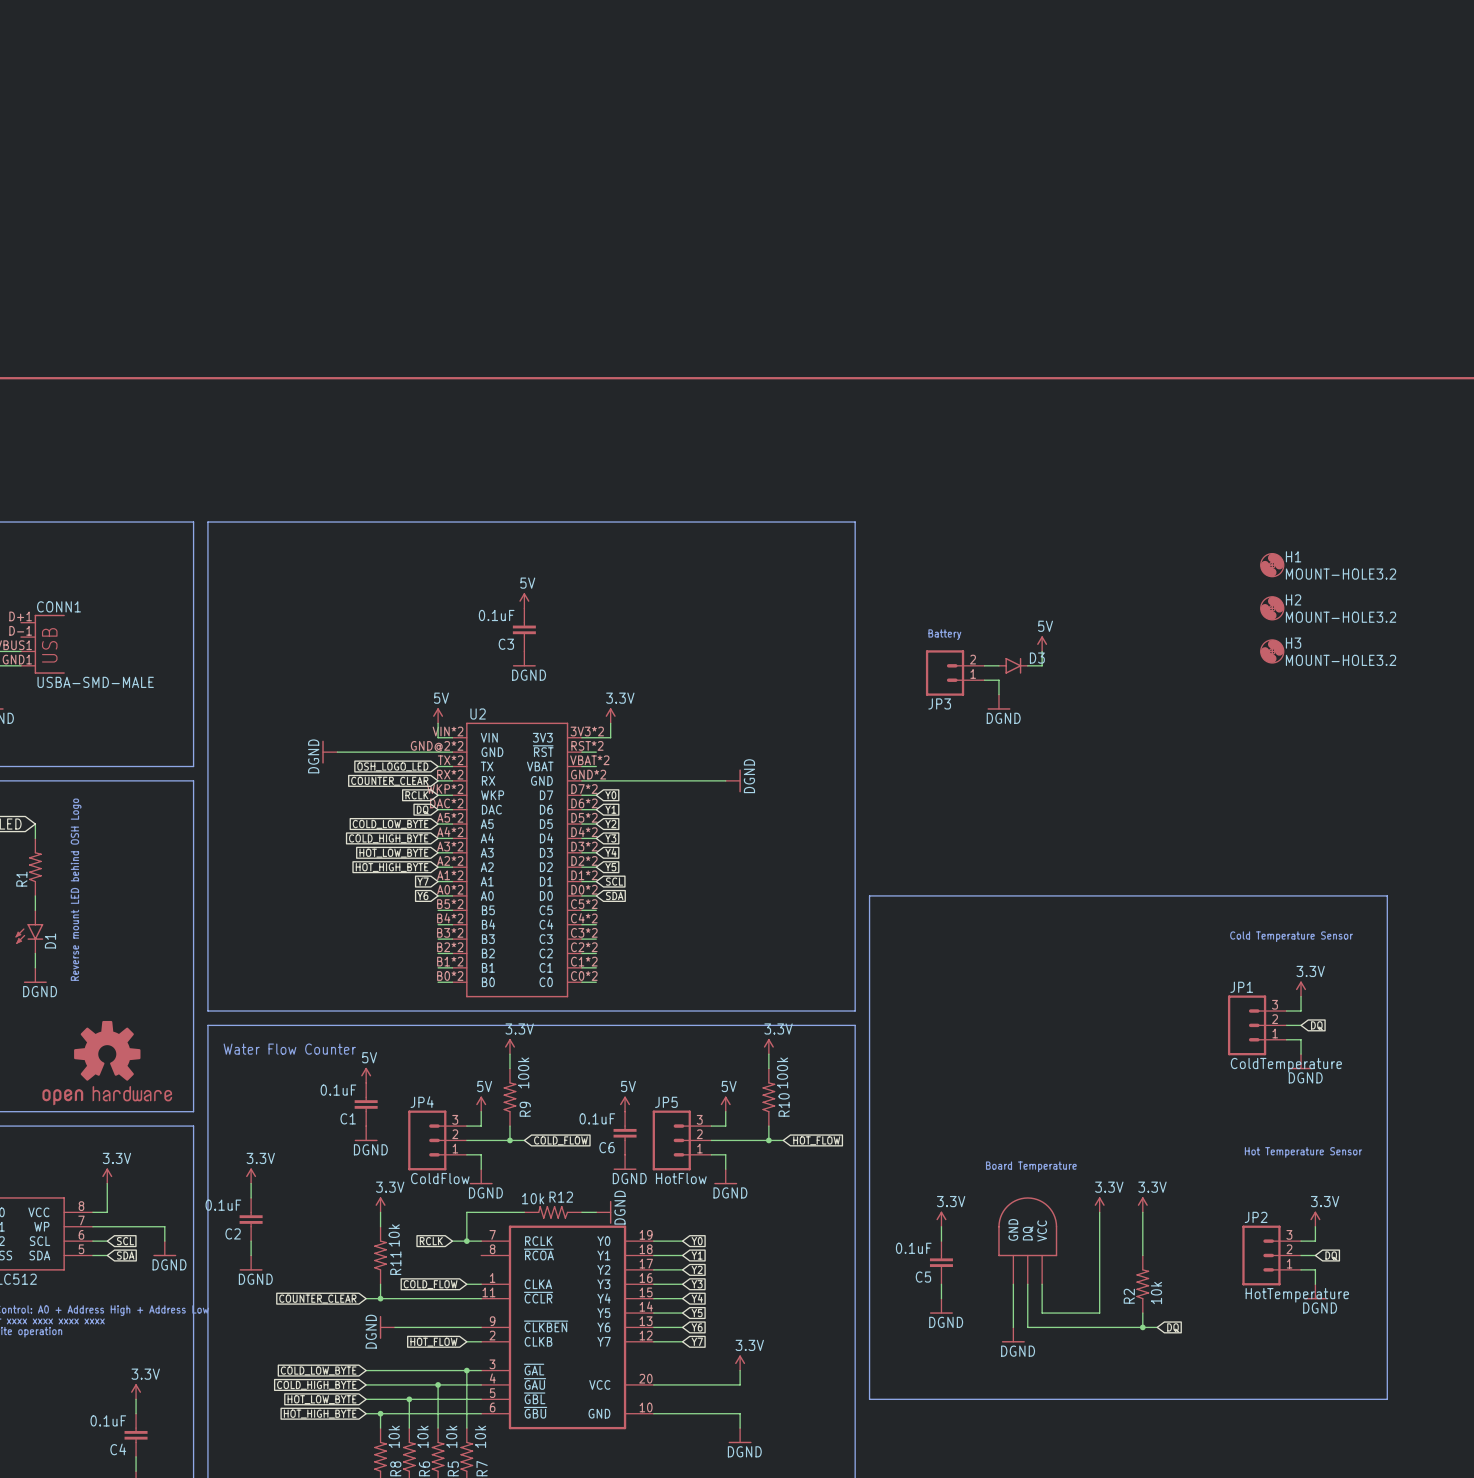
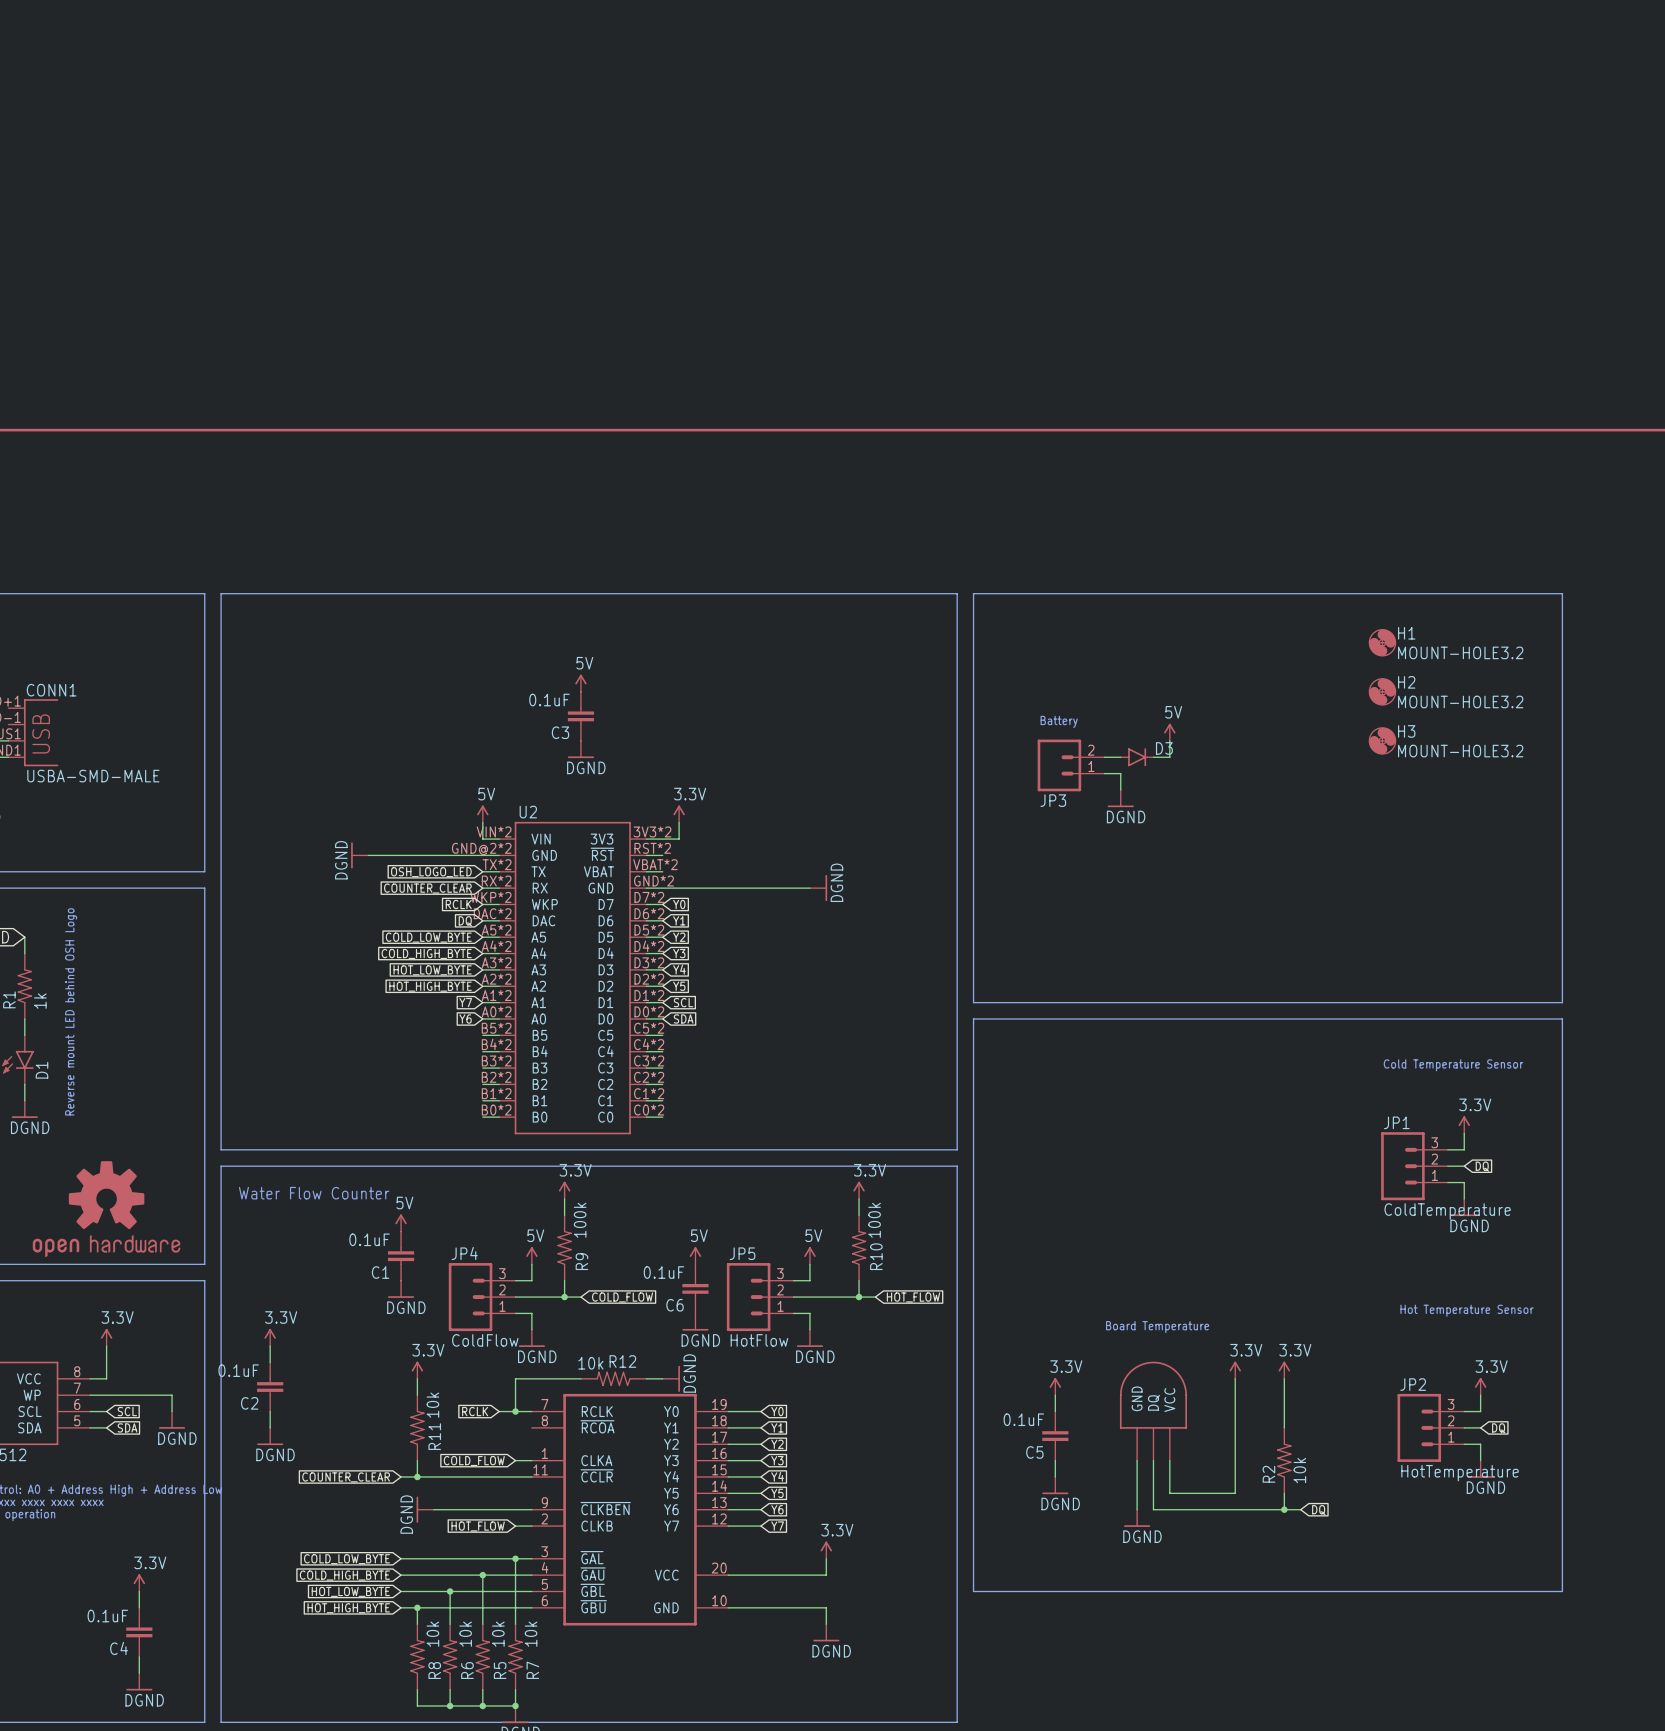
line: none -> (973, 593) (1562, 593) (1562, 1002) (973, 1002) (973, 593)
H1 position: (1272, 565) -> (1382, 642)
H2 position: (1272, 608) -> (1382, 691)
H3 position: (1272, 651) -> (1382, 740)
R1 value: none -> 1k (40, 1001)

